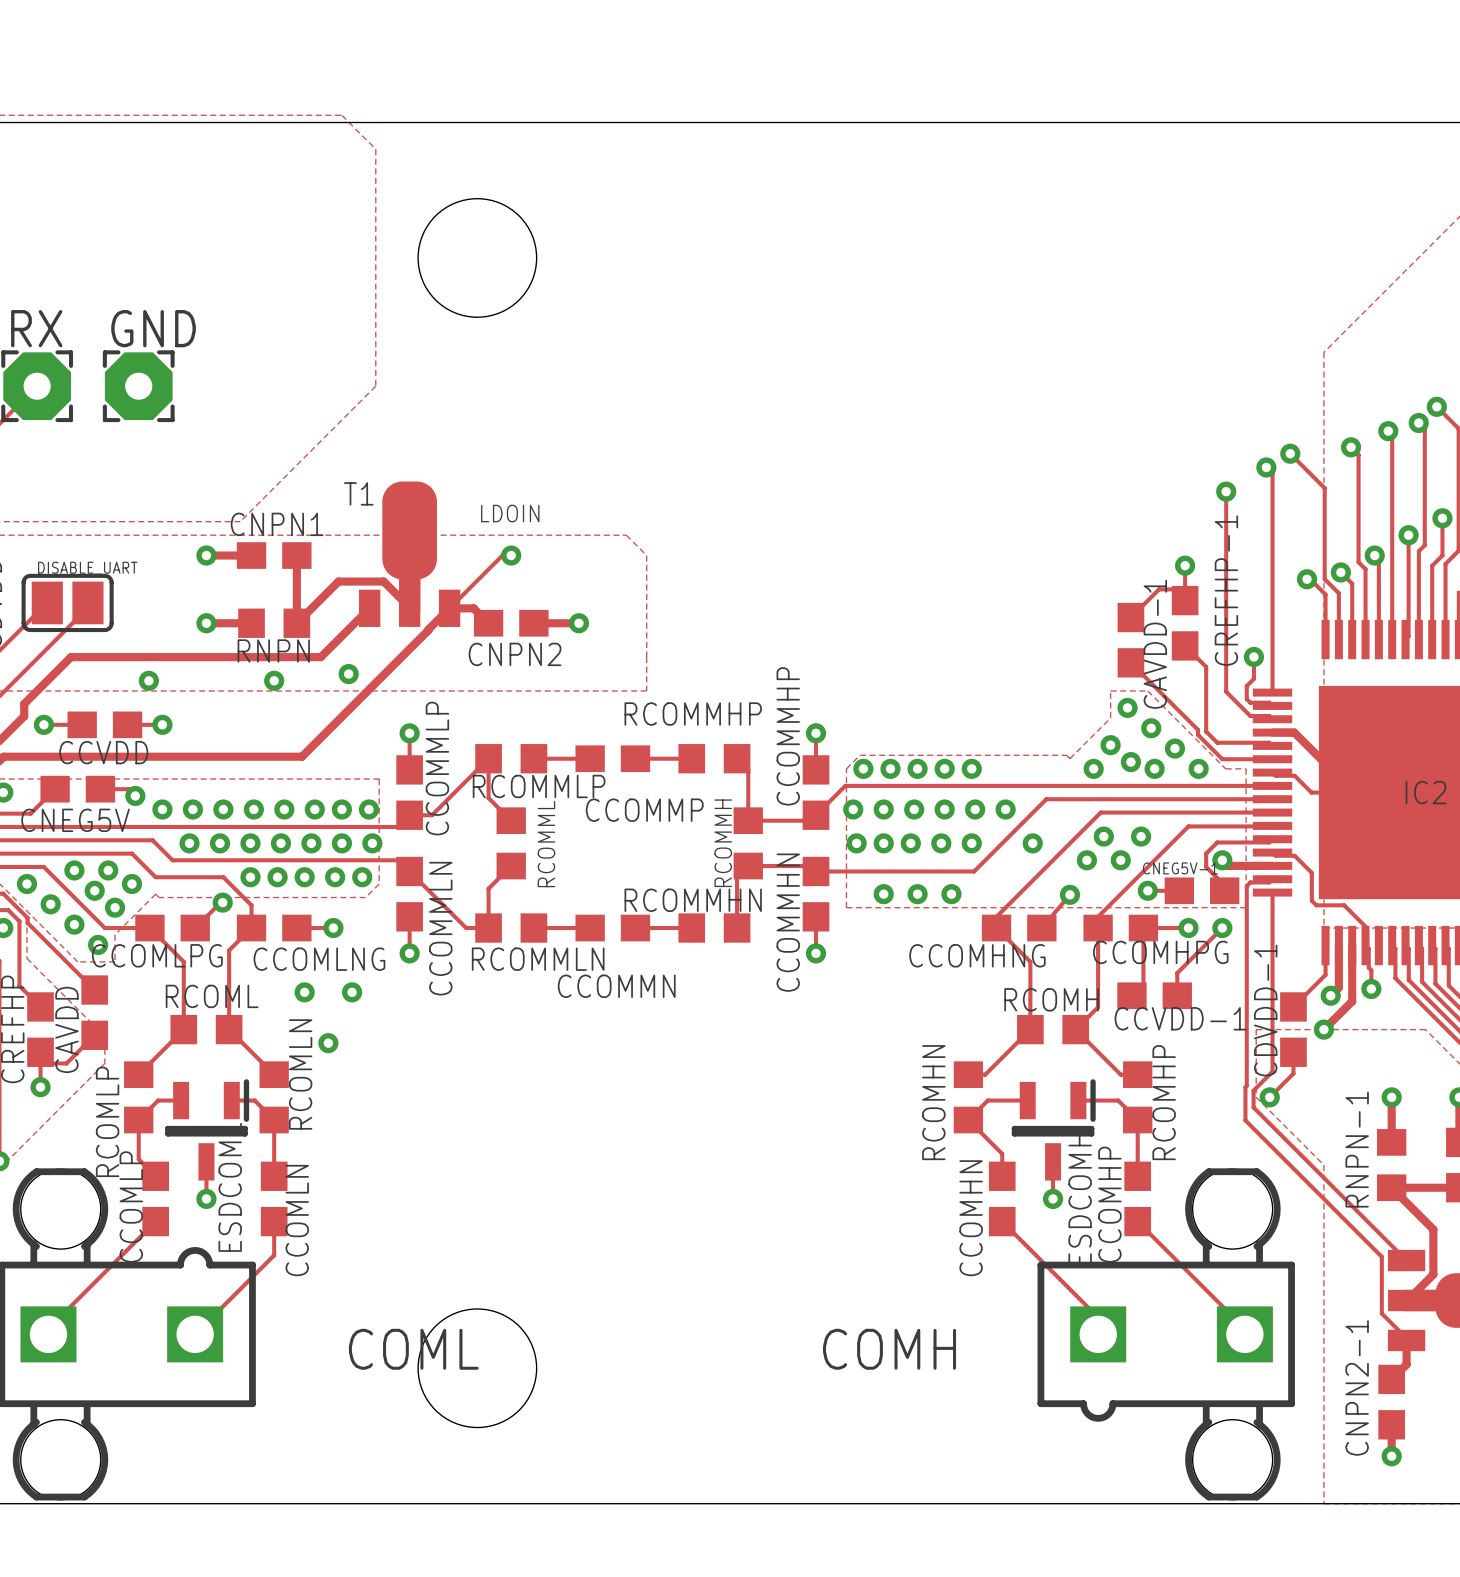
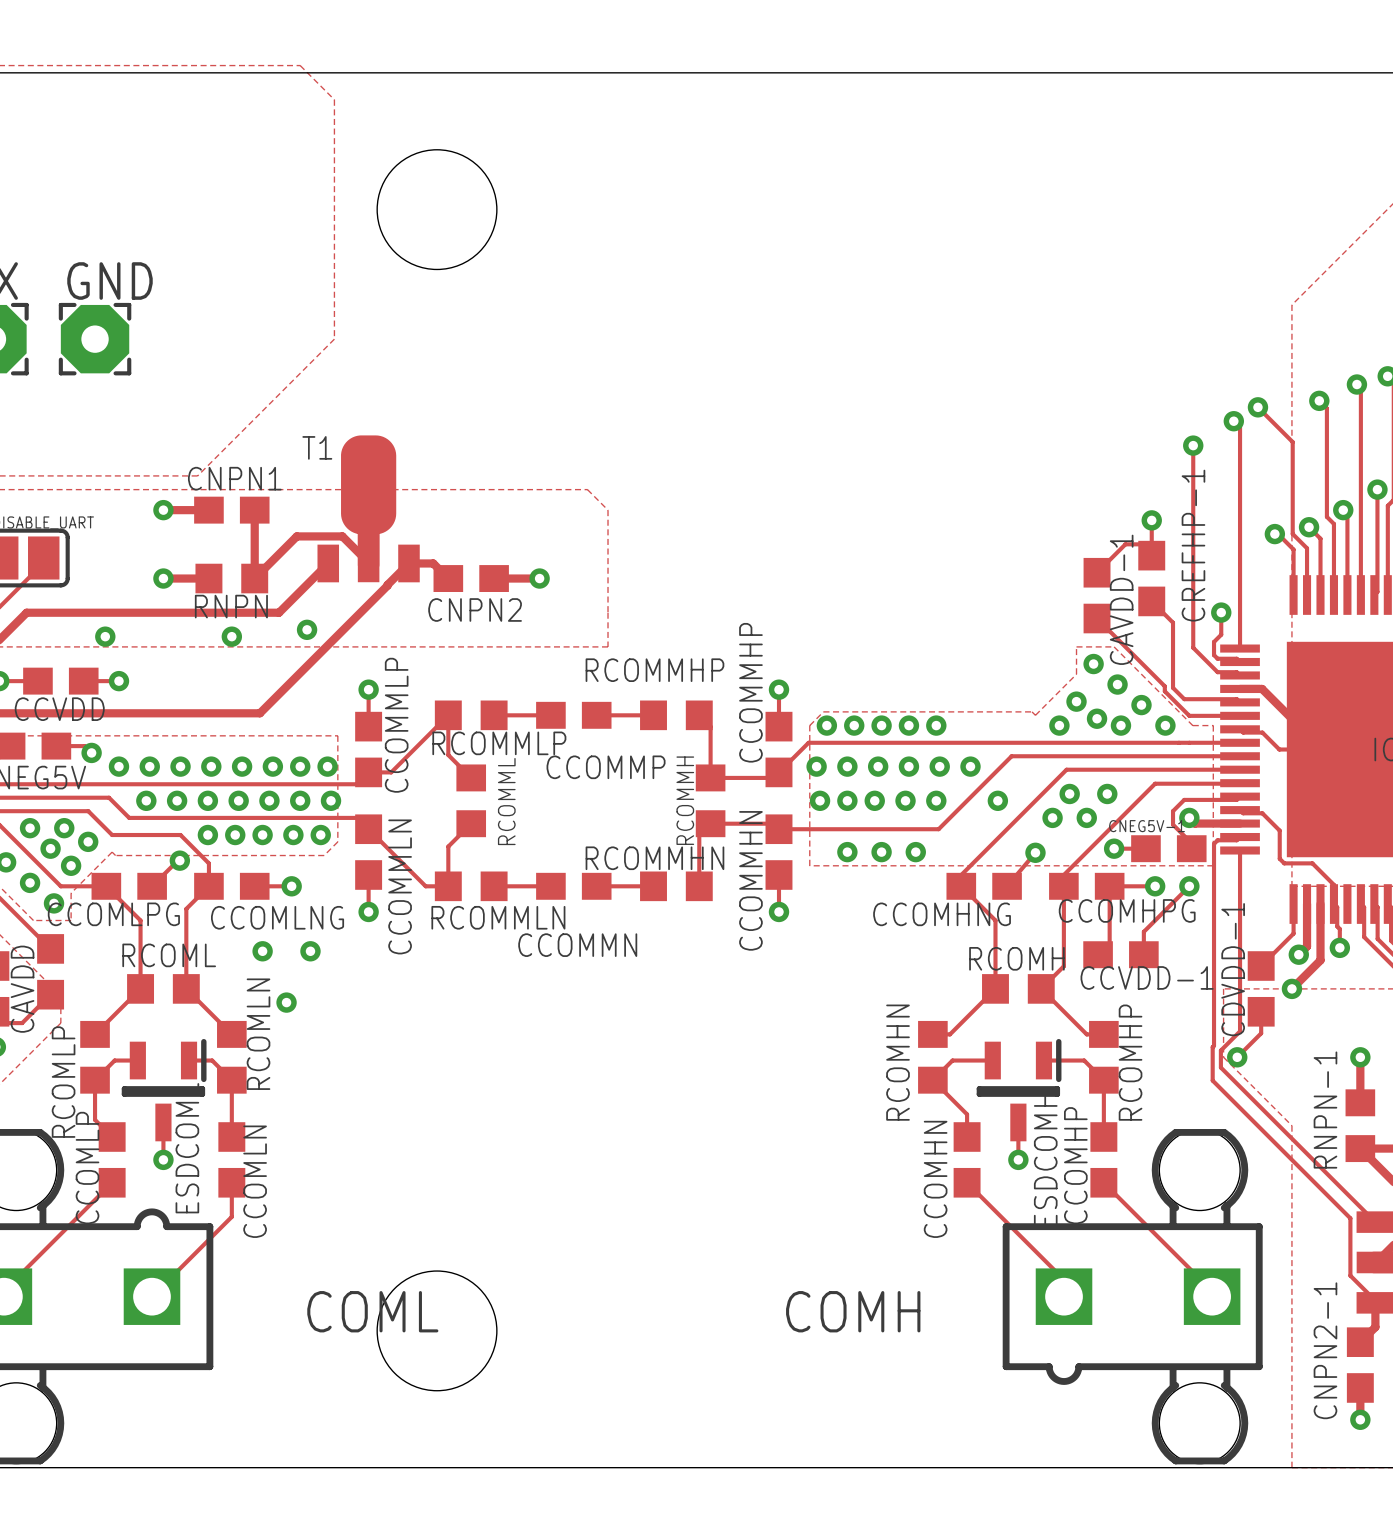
text: LDOIN (510, 513) -> none
track: (511, 555) (502, 555) (449, 608) -> none
via: (511, 555) -> none

